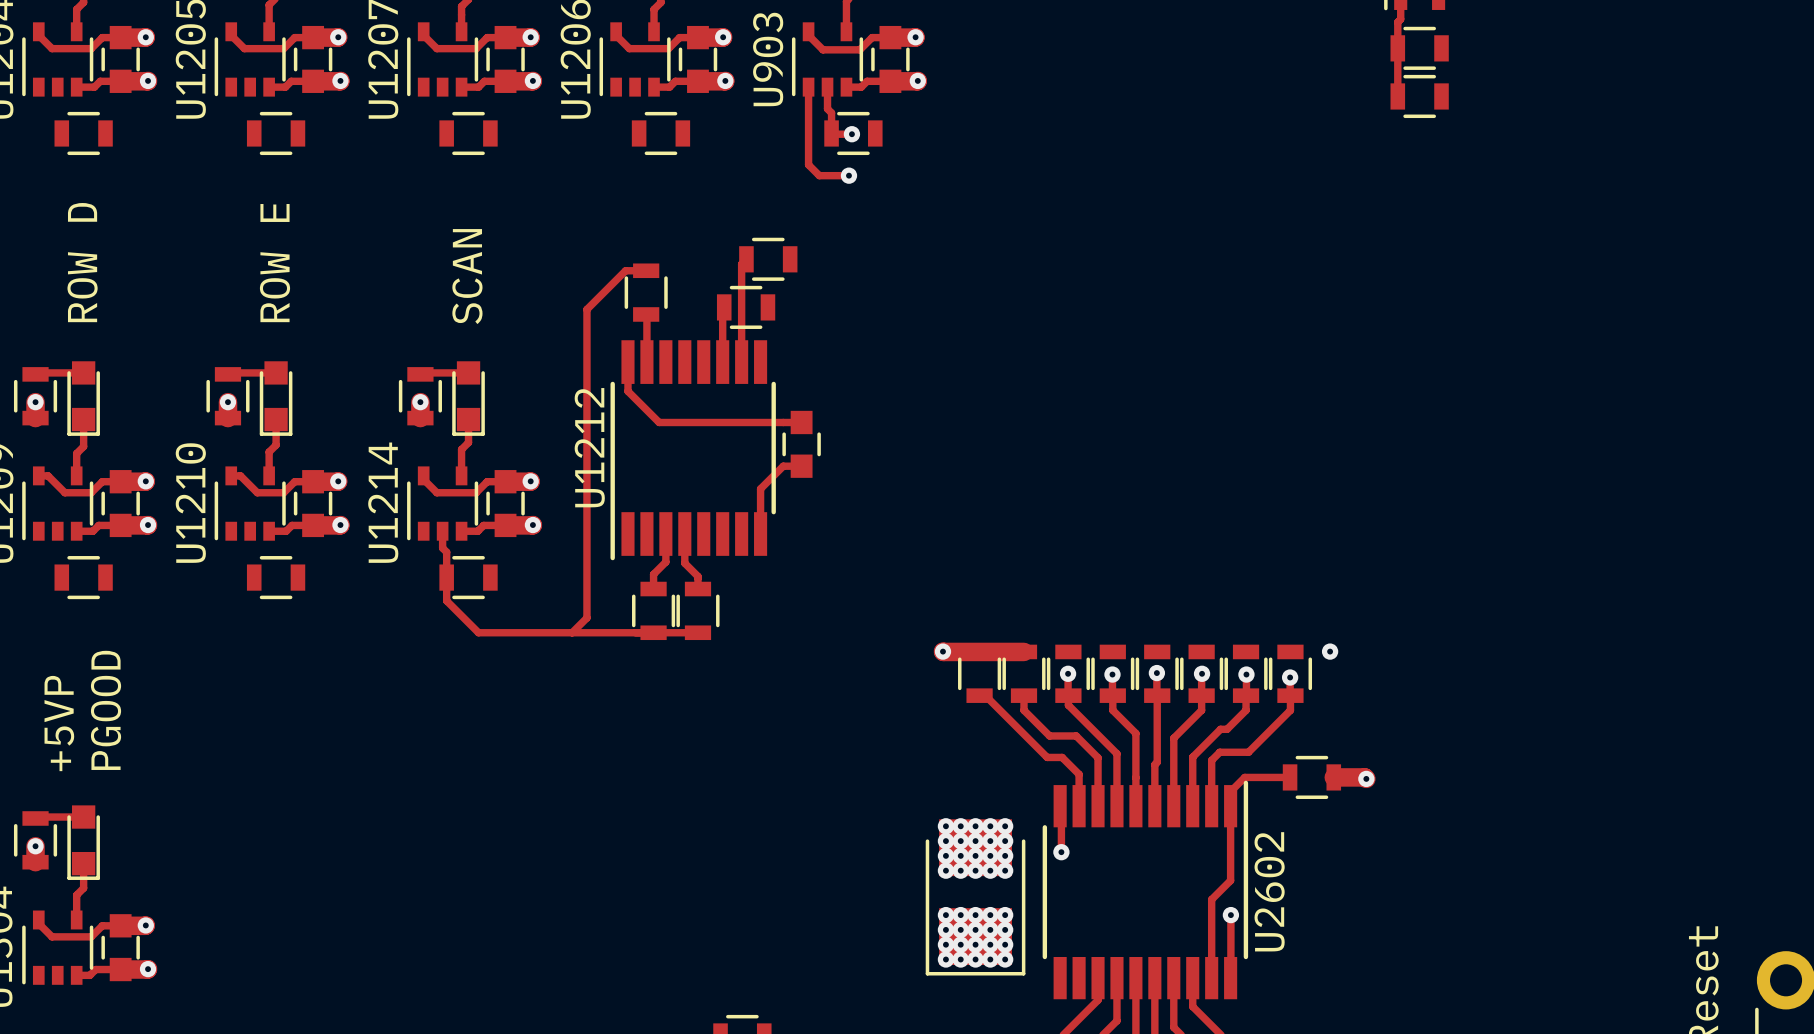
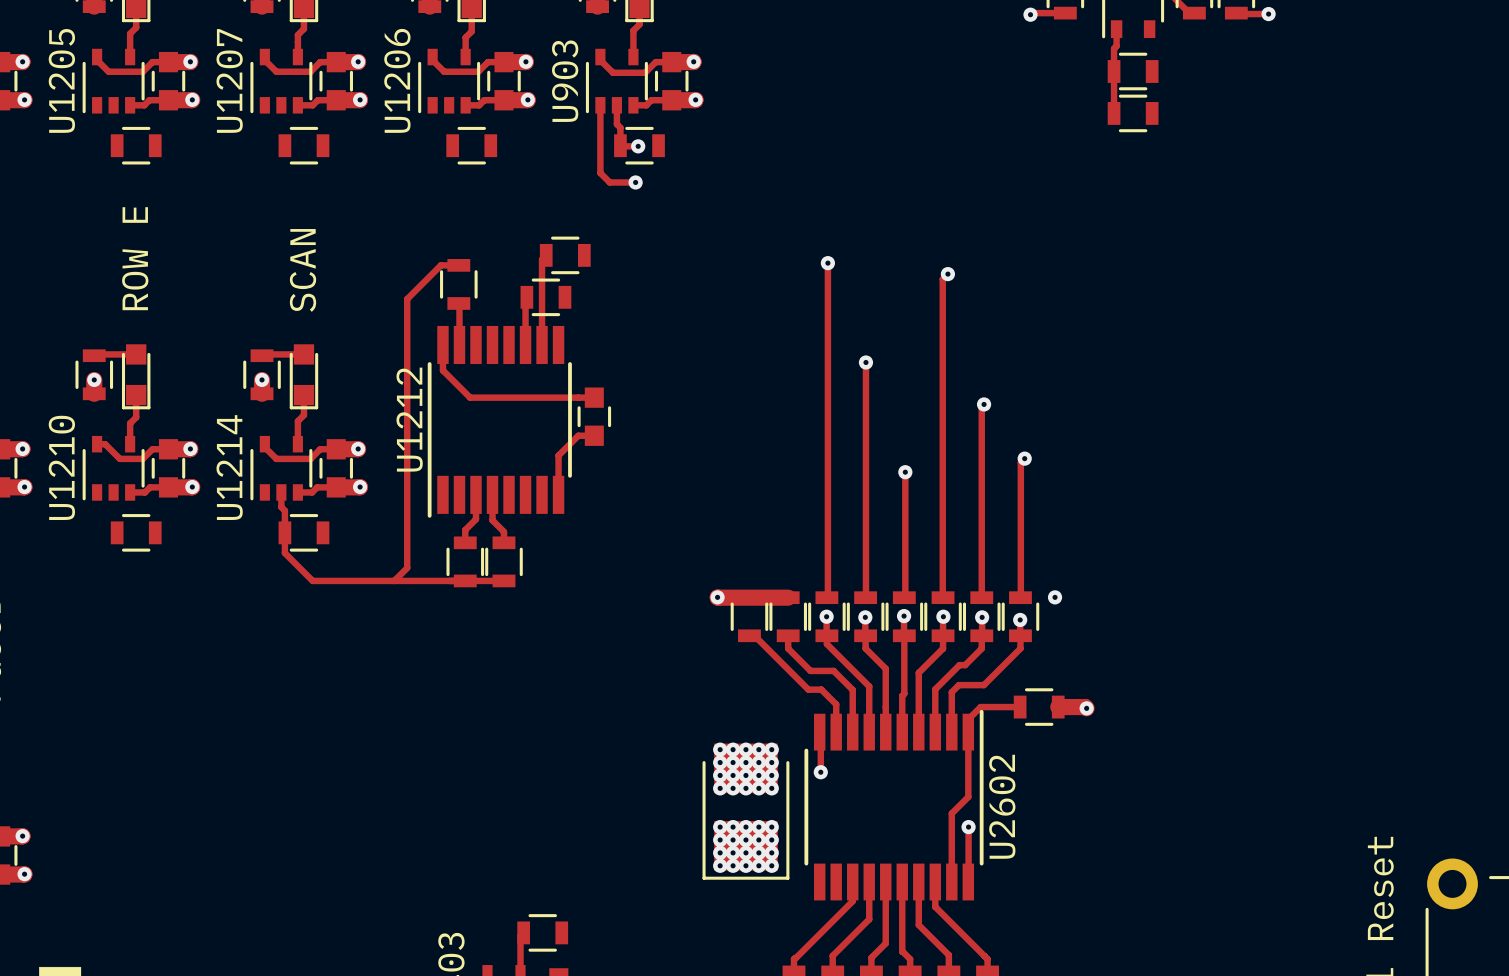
track: none -> (827, 263) (826, 597)
via: none -> (827, 263)
track: none -> (947, 274) (942, 279) (942, 597)
via: none -> (947, 274)
track: none -> (865, 362) (865, 597)
via: none -> (865, 362)
track: none -> (984, 404) (981, 406) (981, 597)
via: none -> (984, 404)
track: none -> (1024, 458) (1020, 462) (1020, 597)
via: none -> (1024, 458)
track: none -> (905, 472) (904, 597)
via: none -> (905, 472)

